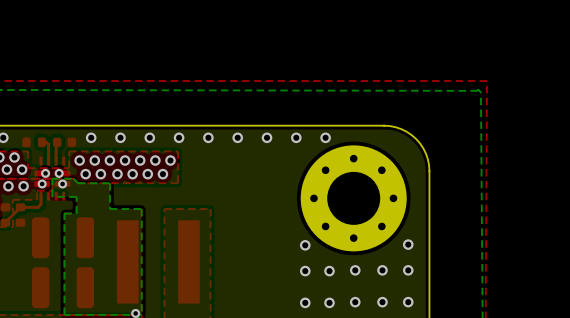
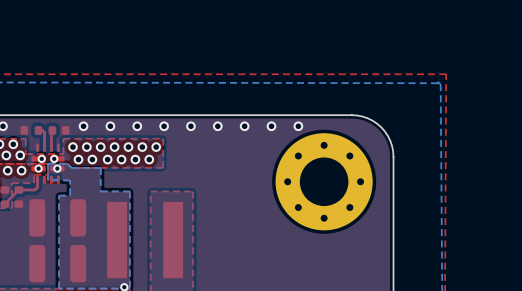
via: (408, 244) -> none
via: (305, 245) -> none
via: (355, 270) -> none
via: (382, 270) -> none
via: (408, 270) -> none
via: (305, 271) -> none
via: (329, 271) -> none
via: (305, 302) -> none
via: (329, 302) -> none
via: (355, 302) -> none
via: (382, 302) -> none
via: (408, 302) -> none

